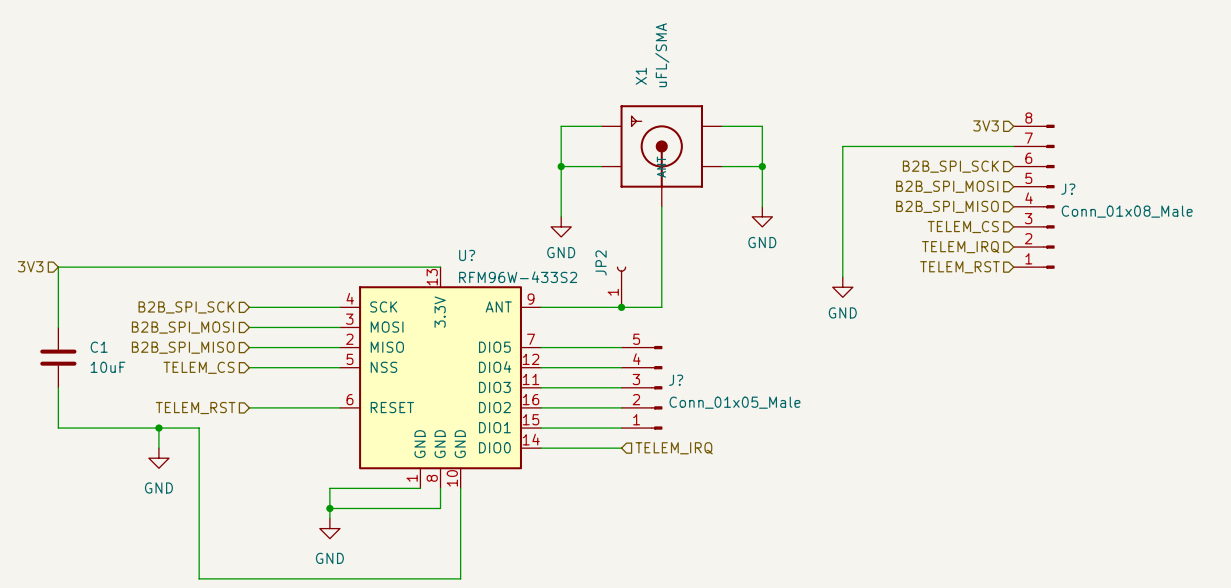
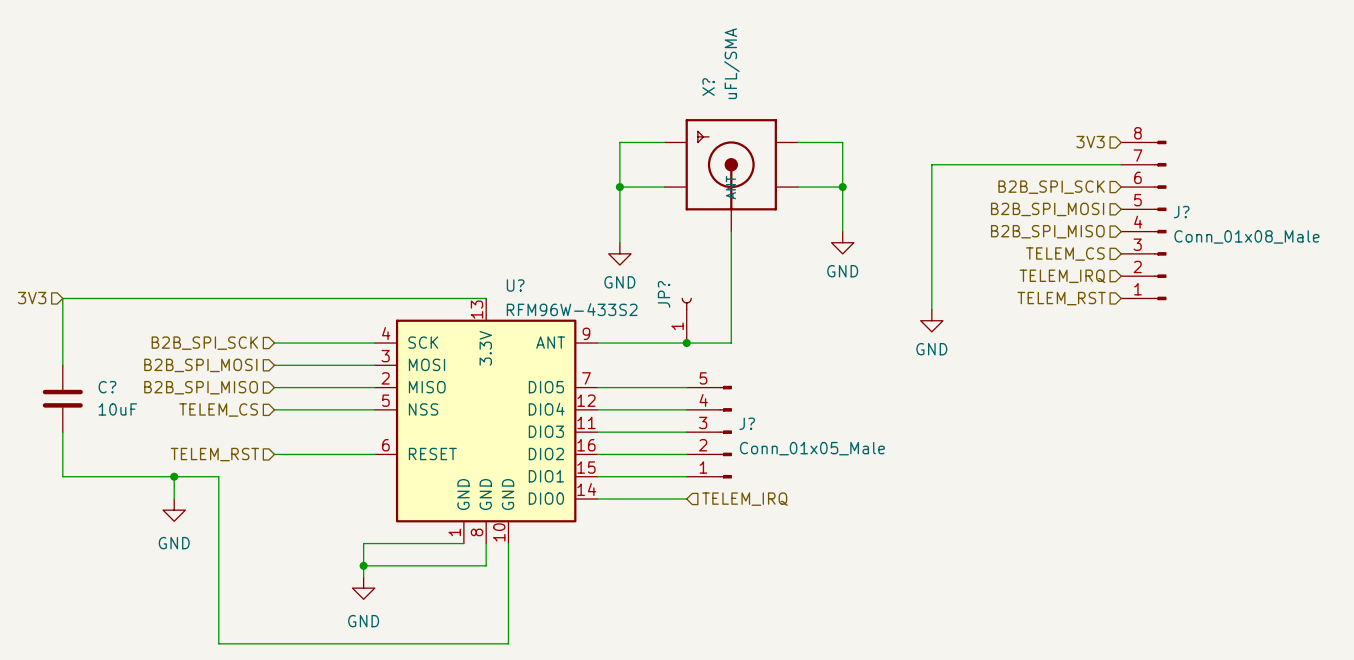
X1 name: X1 (641, 76) -> X? (708, 87)
JP2 name: JP2 (601, 262) -> JP? (664, 294)
C1 name: C1 (99, 347) -> C? (107, 387)

